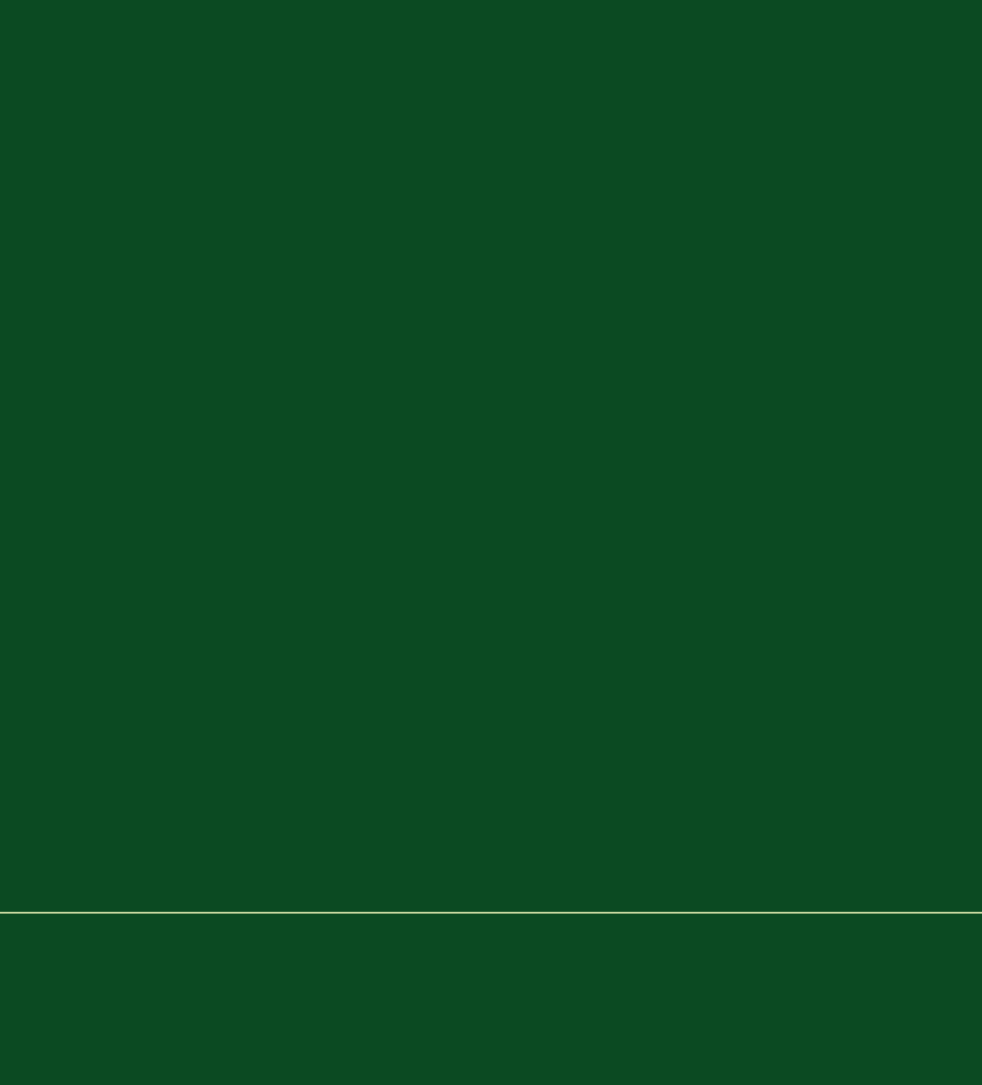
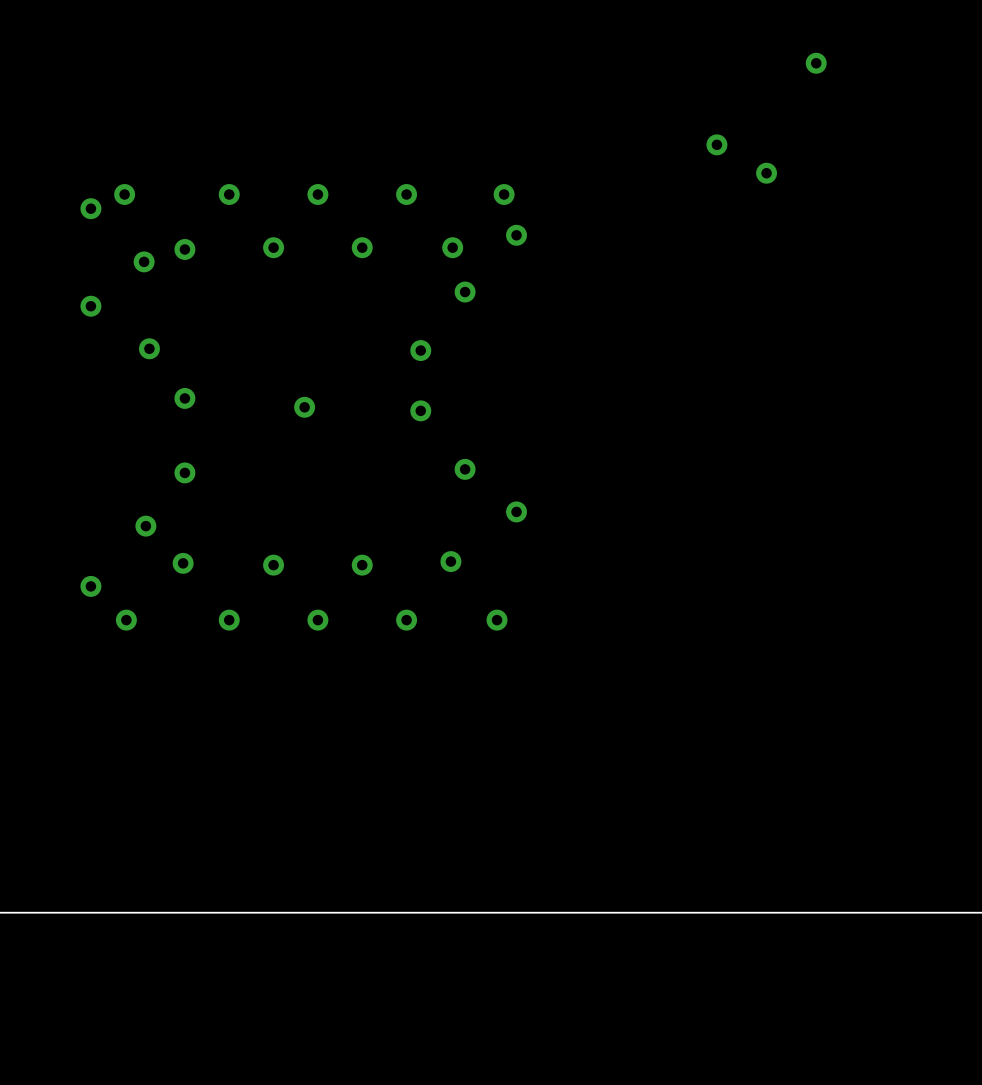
via: none -> (816, 63)
via: none -> (716, 144)
via: none -> (766, 173)
via: none -> (124, 194)
via: none -> (229, 194)
via: none -> (317, 194)
via: none -> (406, 194)
via: none -> (504, 194)
via: none -> (90, 208)
via: none -> (516, 235)
via: none -> (273, 247)
via: none -> (362, 247)
via: none -> (452, 247)
via: none -> (184, 249)
via: none -> (144, 261)
via: none -> (465, 292)
via: none -> (90, 306)
via: none -> (149, 348)
via: none -> (420, 350)
via: none -> (184, 398)
via: none -> (304, 407)
via: none -> (420, 410)
via: none -> (465, 469)
via: none -> (184, 472)
via: none -> (516, 511)
via: none -> (145, 526)
via: none -> (450, 561)
via: none -> (183, 563)
via: none -> (273, 565)
via: none -> (362, 565)
via: none -> (90, 586)
via: none -> (126, 620)
via: none -> (229, 620)
via: none -> (317, 620)
via: none -> (406, 620)
via: none -> (497, 620)

